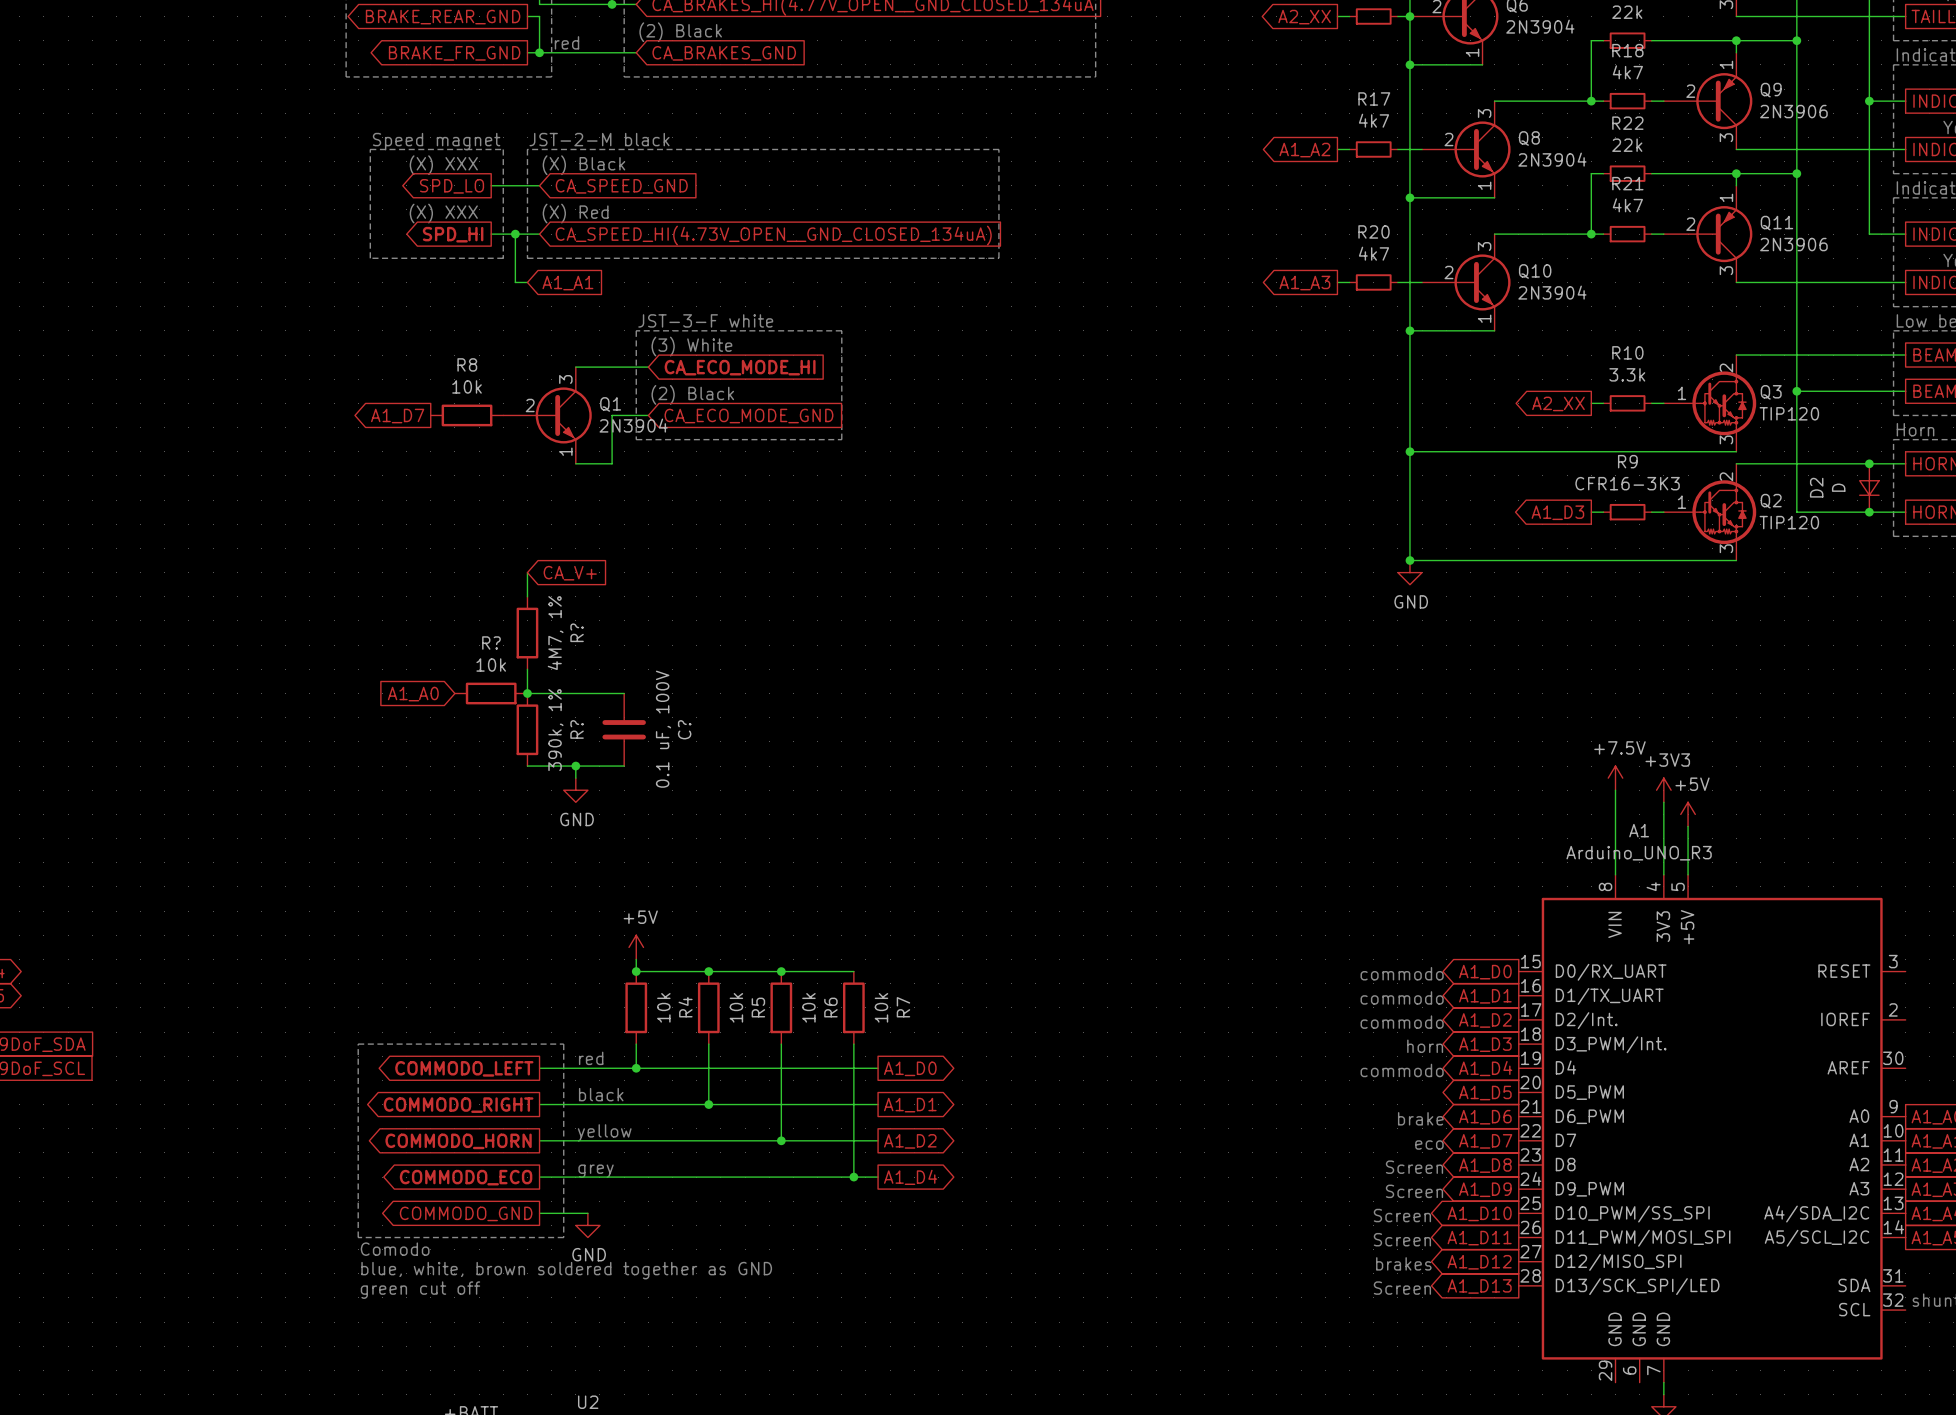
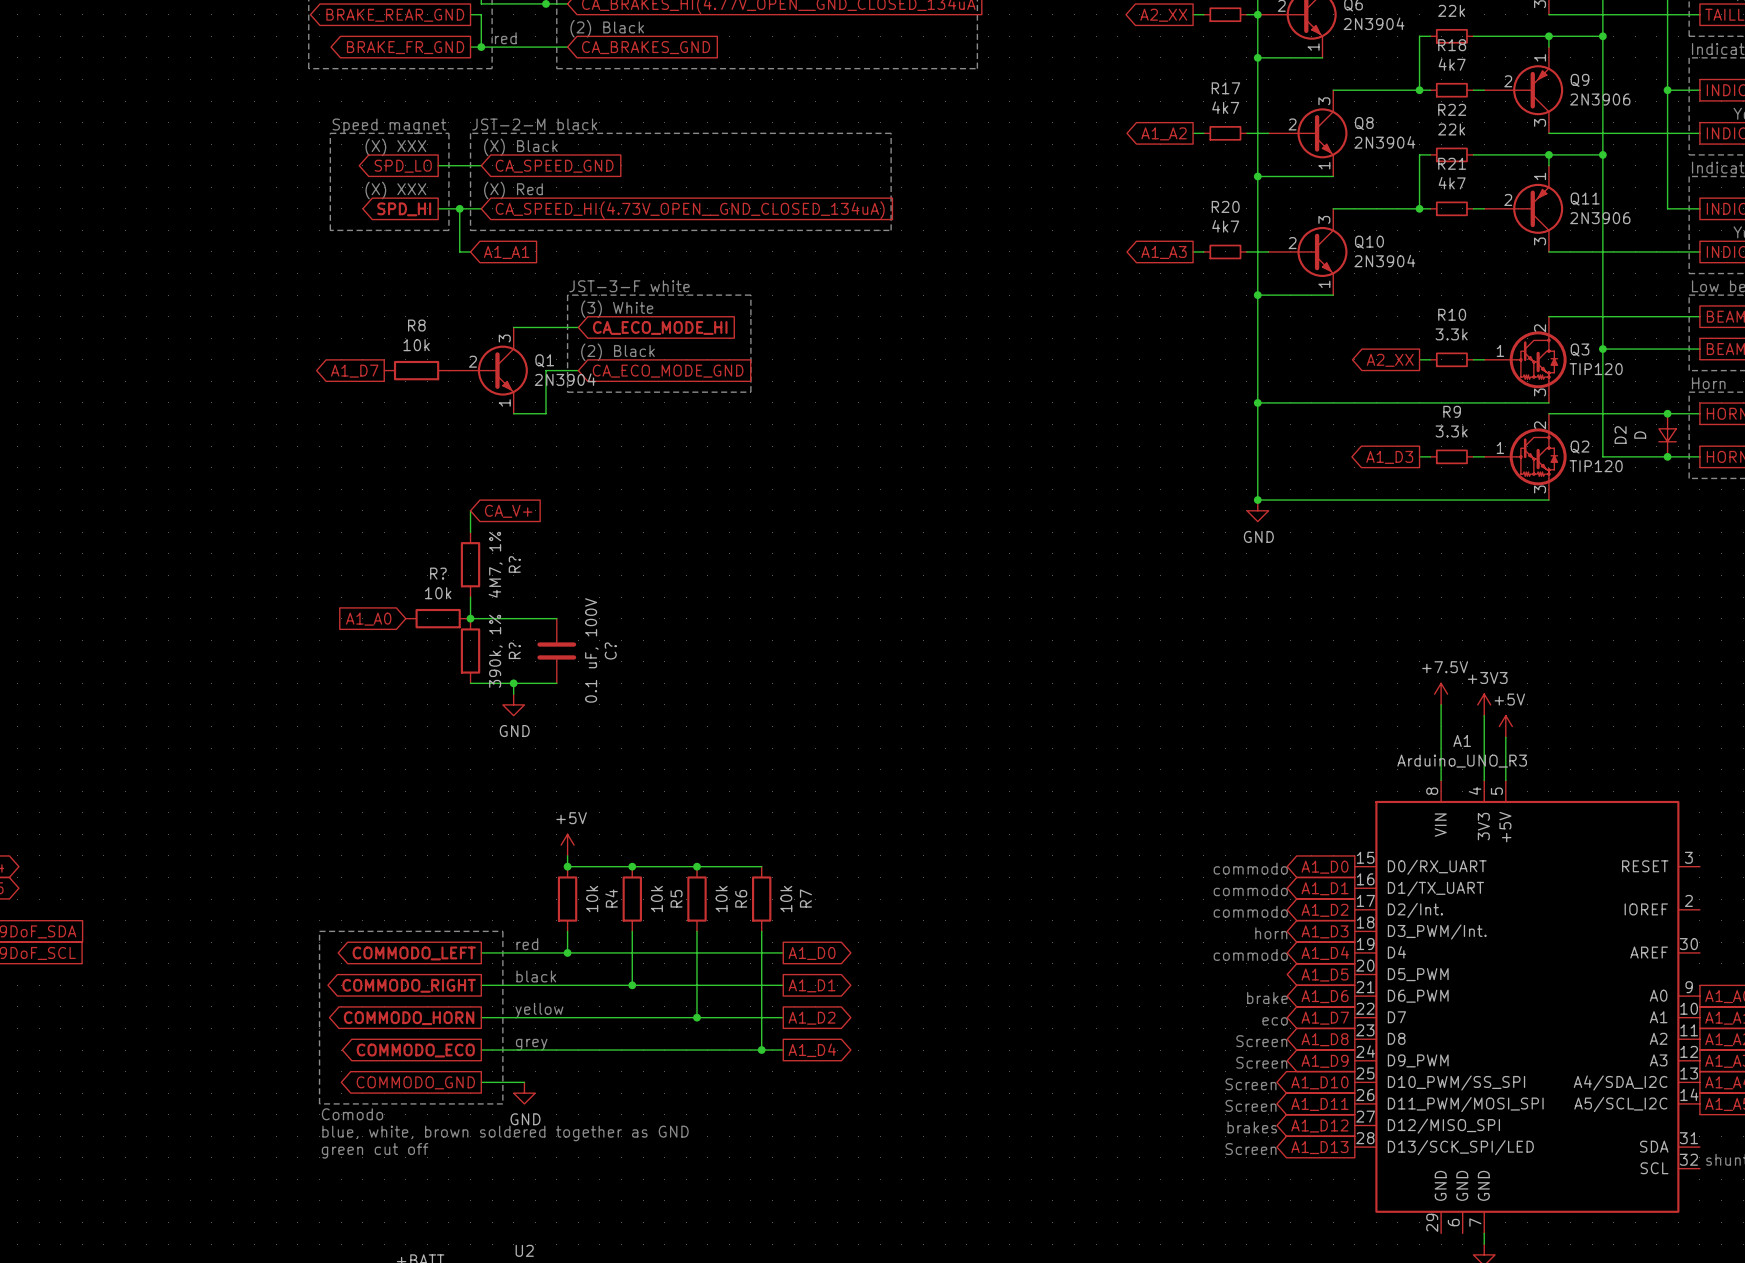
R9 value: CFR16-3K3 (1627, 483) -> 3.3k (1451, 431)

